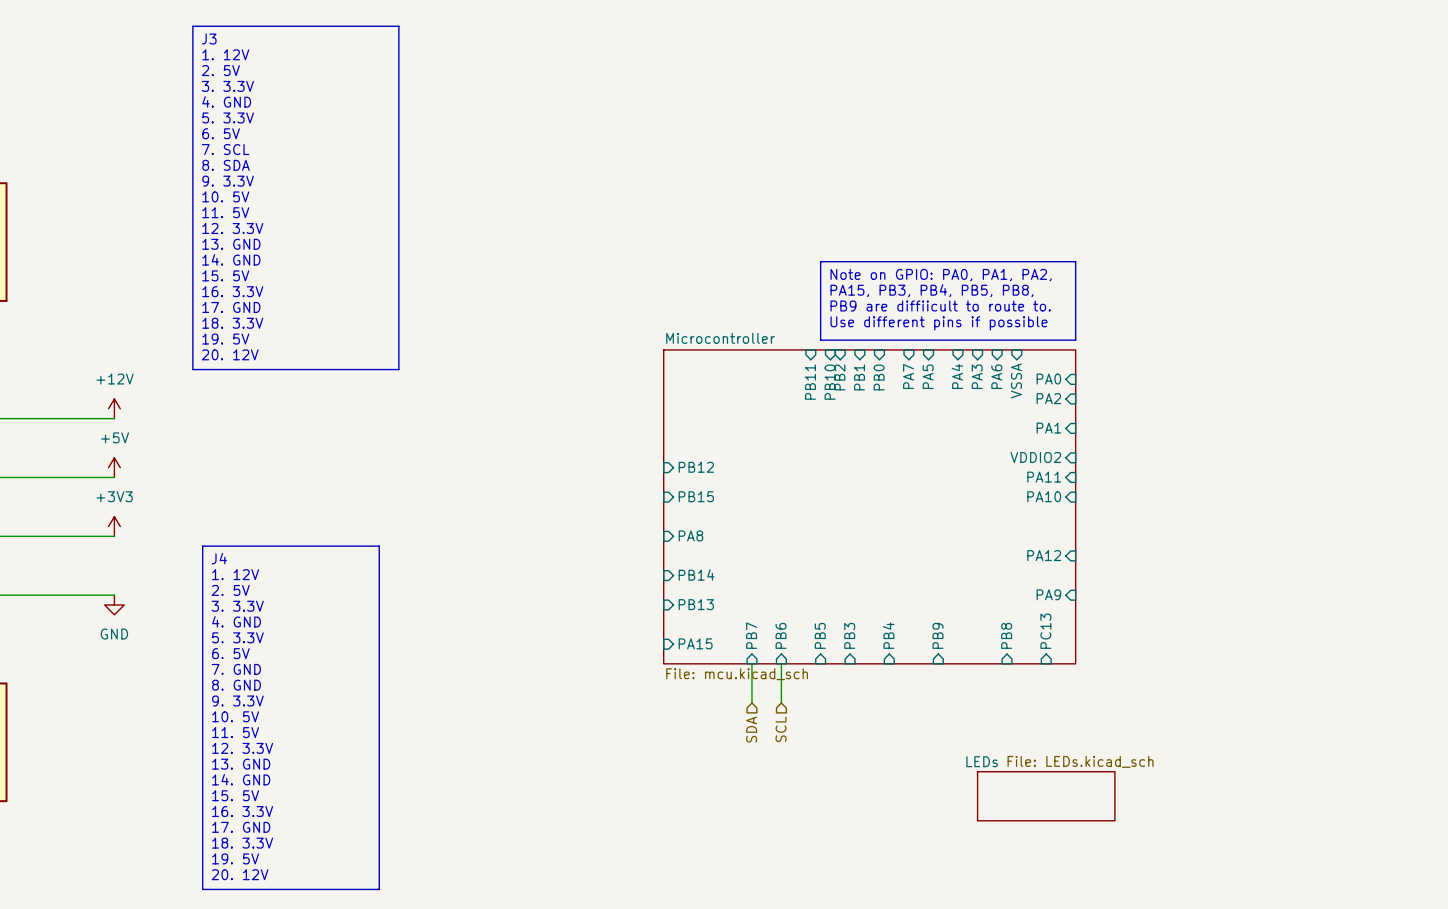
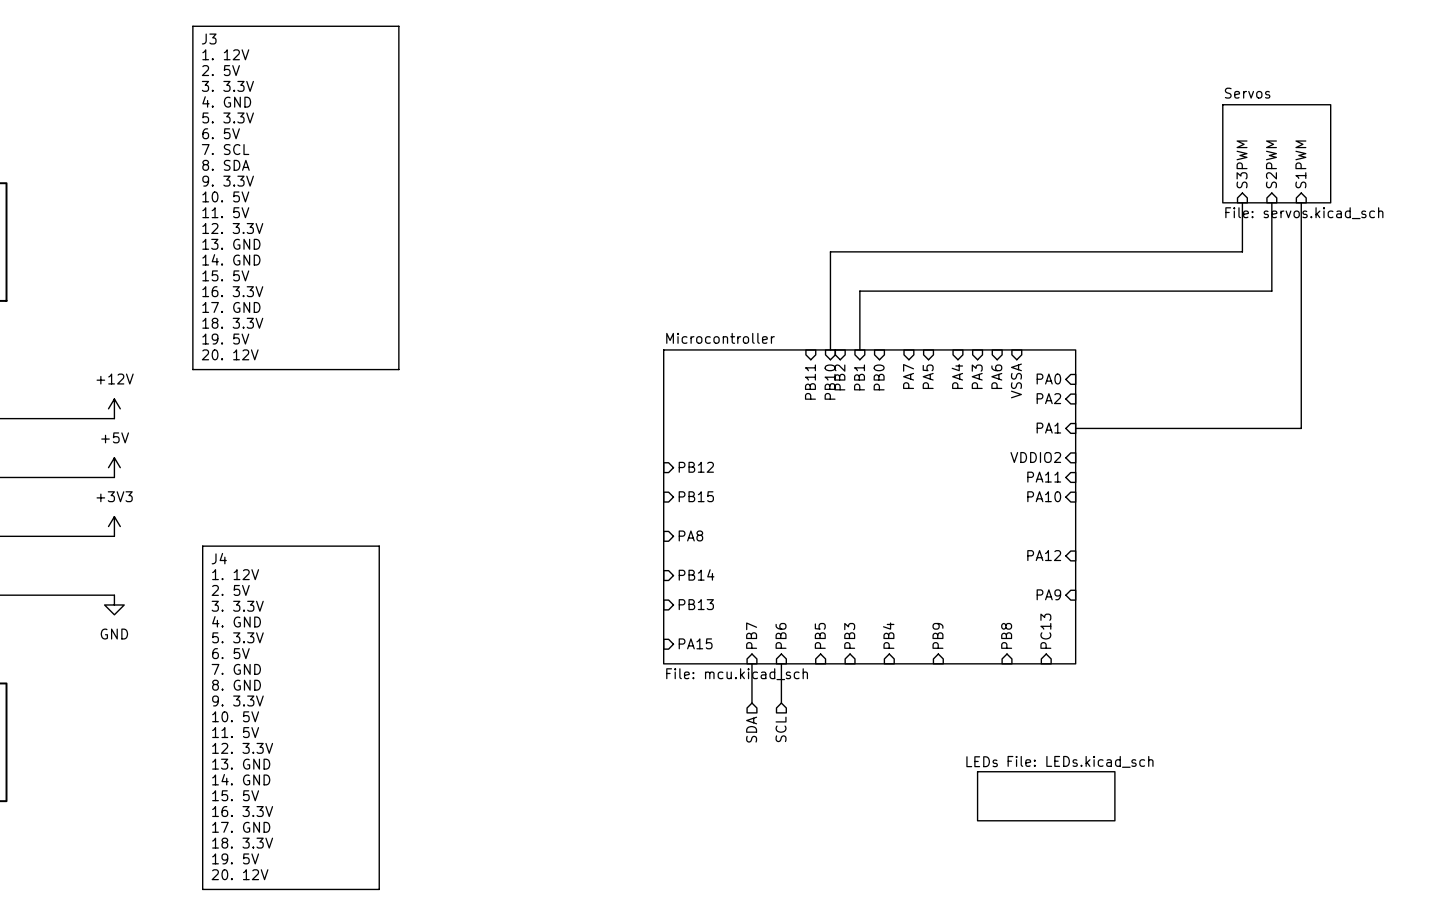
sheet Servos: none -> File: servos.kicad_sch (1276, 153)
hierarchical label: none -> S3PWM (1242, 164)
hierarchical label: none -> S2PWM (1271, 164)
hierarchical label: none -> S1PWM (1300, 164)
wire: none -> (1242, 202) (1242, 251) (830, 251) (830, 349)
wire: none -> (1271, 202) (1271, 291) (859, 291) (859, 349)
wire: none -> (1301, 202) (1301, 428) (1075, 428)
line: (820, 261) (1075, 261) (1075, 340) (820, 340) (820, 261) -> none
text: Note on GPIO: PA0, PA1, PA2, (941, 275) -> none
text: PA15, PB3, PB4, PB5, PB8, (931, 290) -> none
text: PB9 are diffiicult to route to. (940, 305) -> none
text: Use different pins if possible (939, 323) -> none

